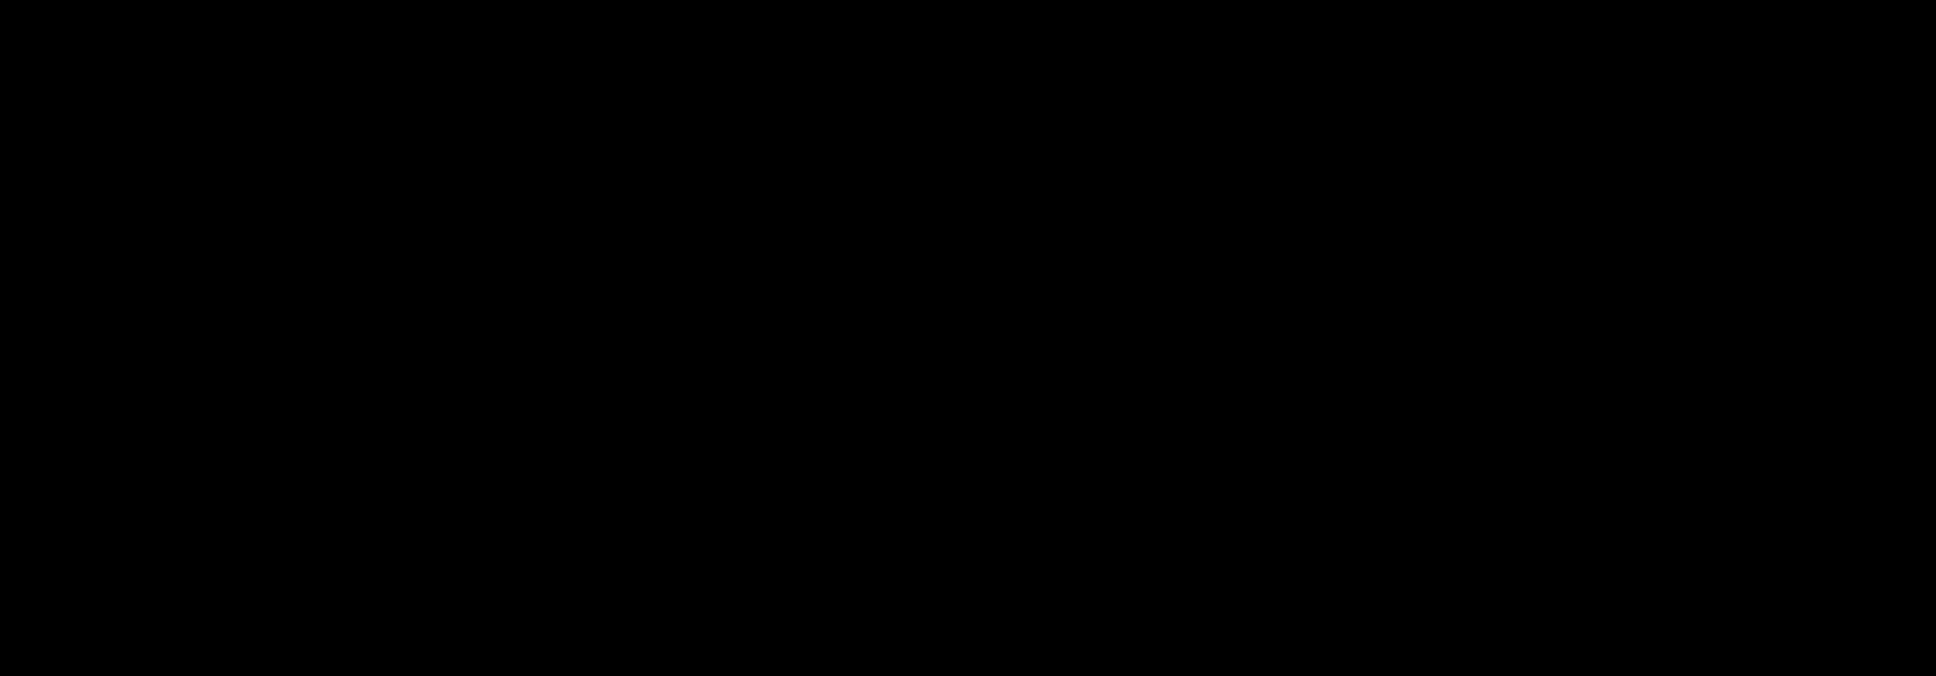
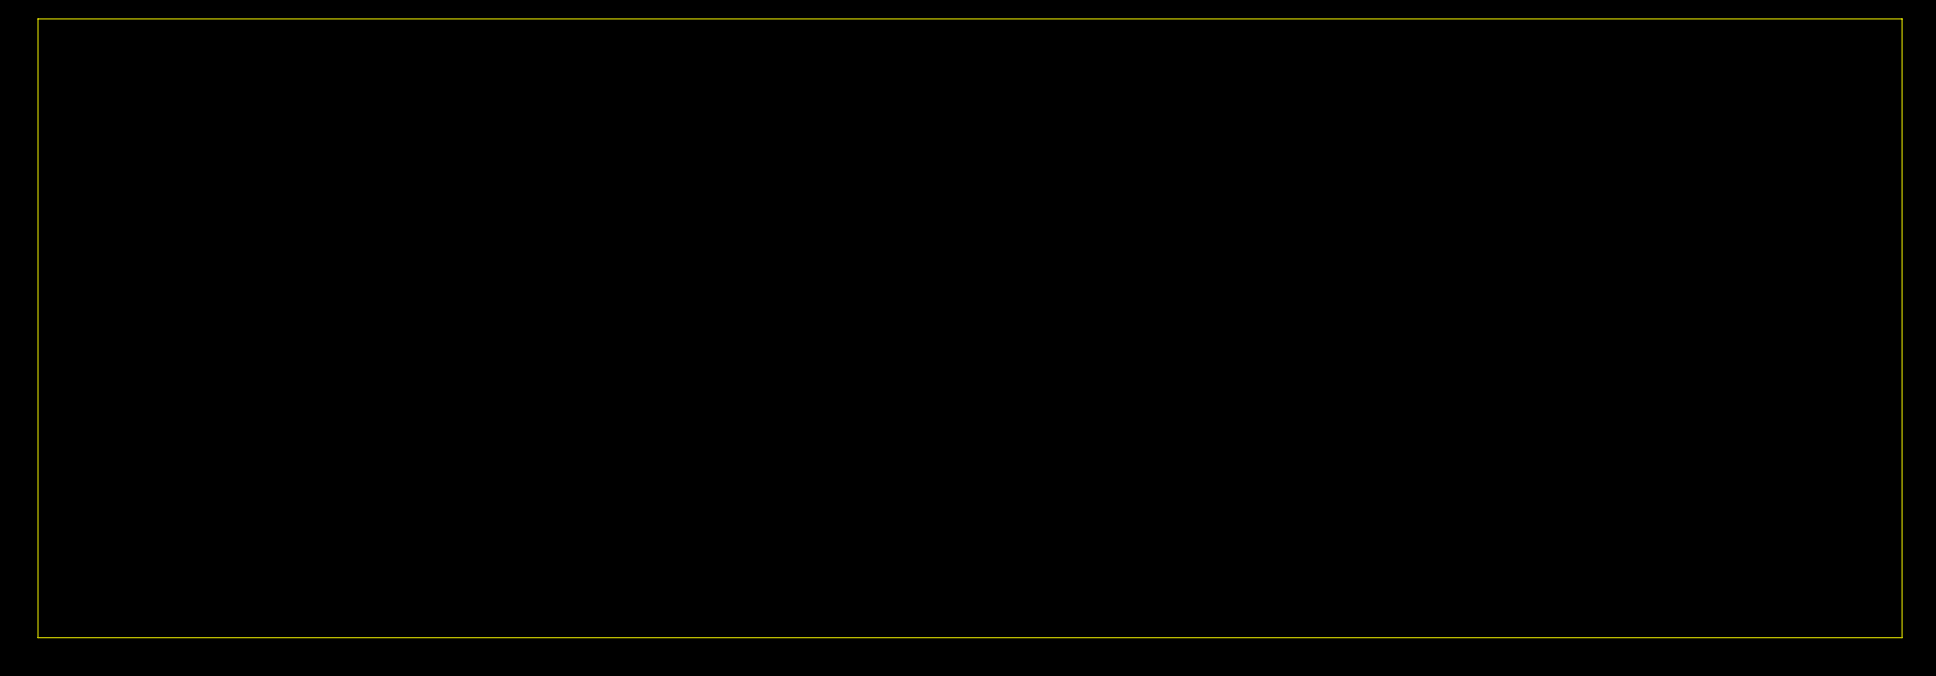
board edge: none -> (38, 18) (1902, 18) (1902, 637) (38, 637) (38, 18)

